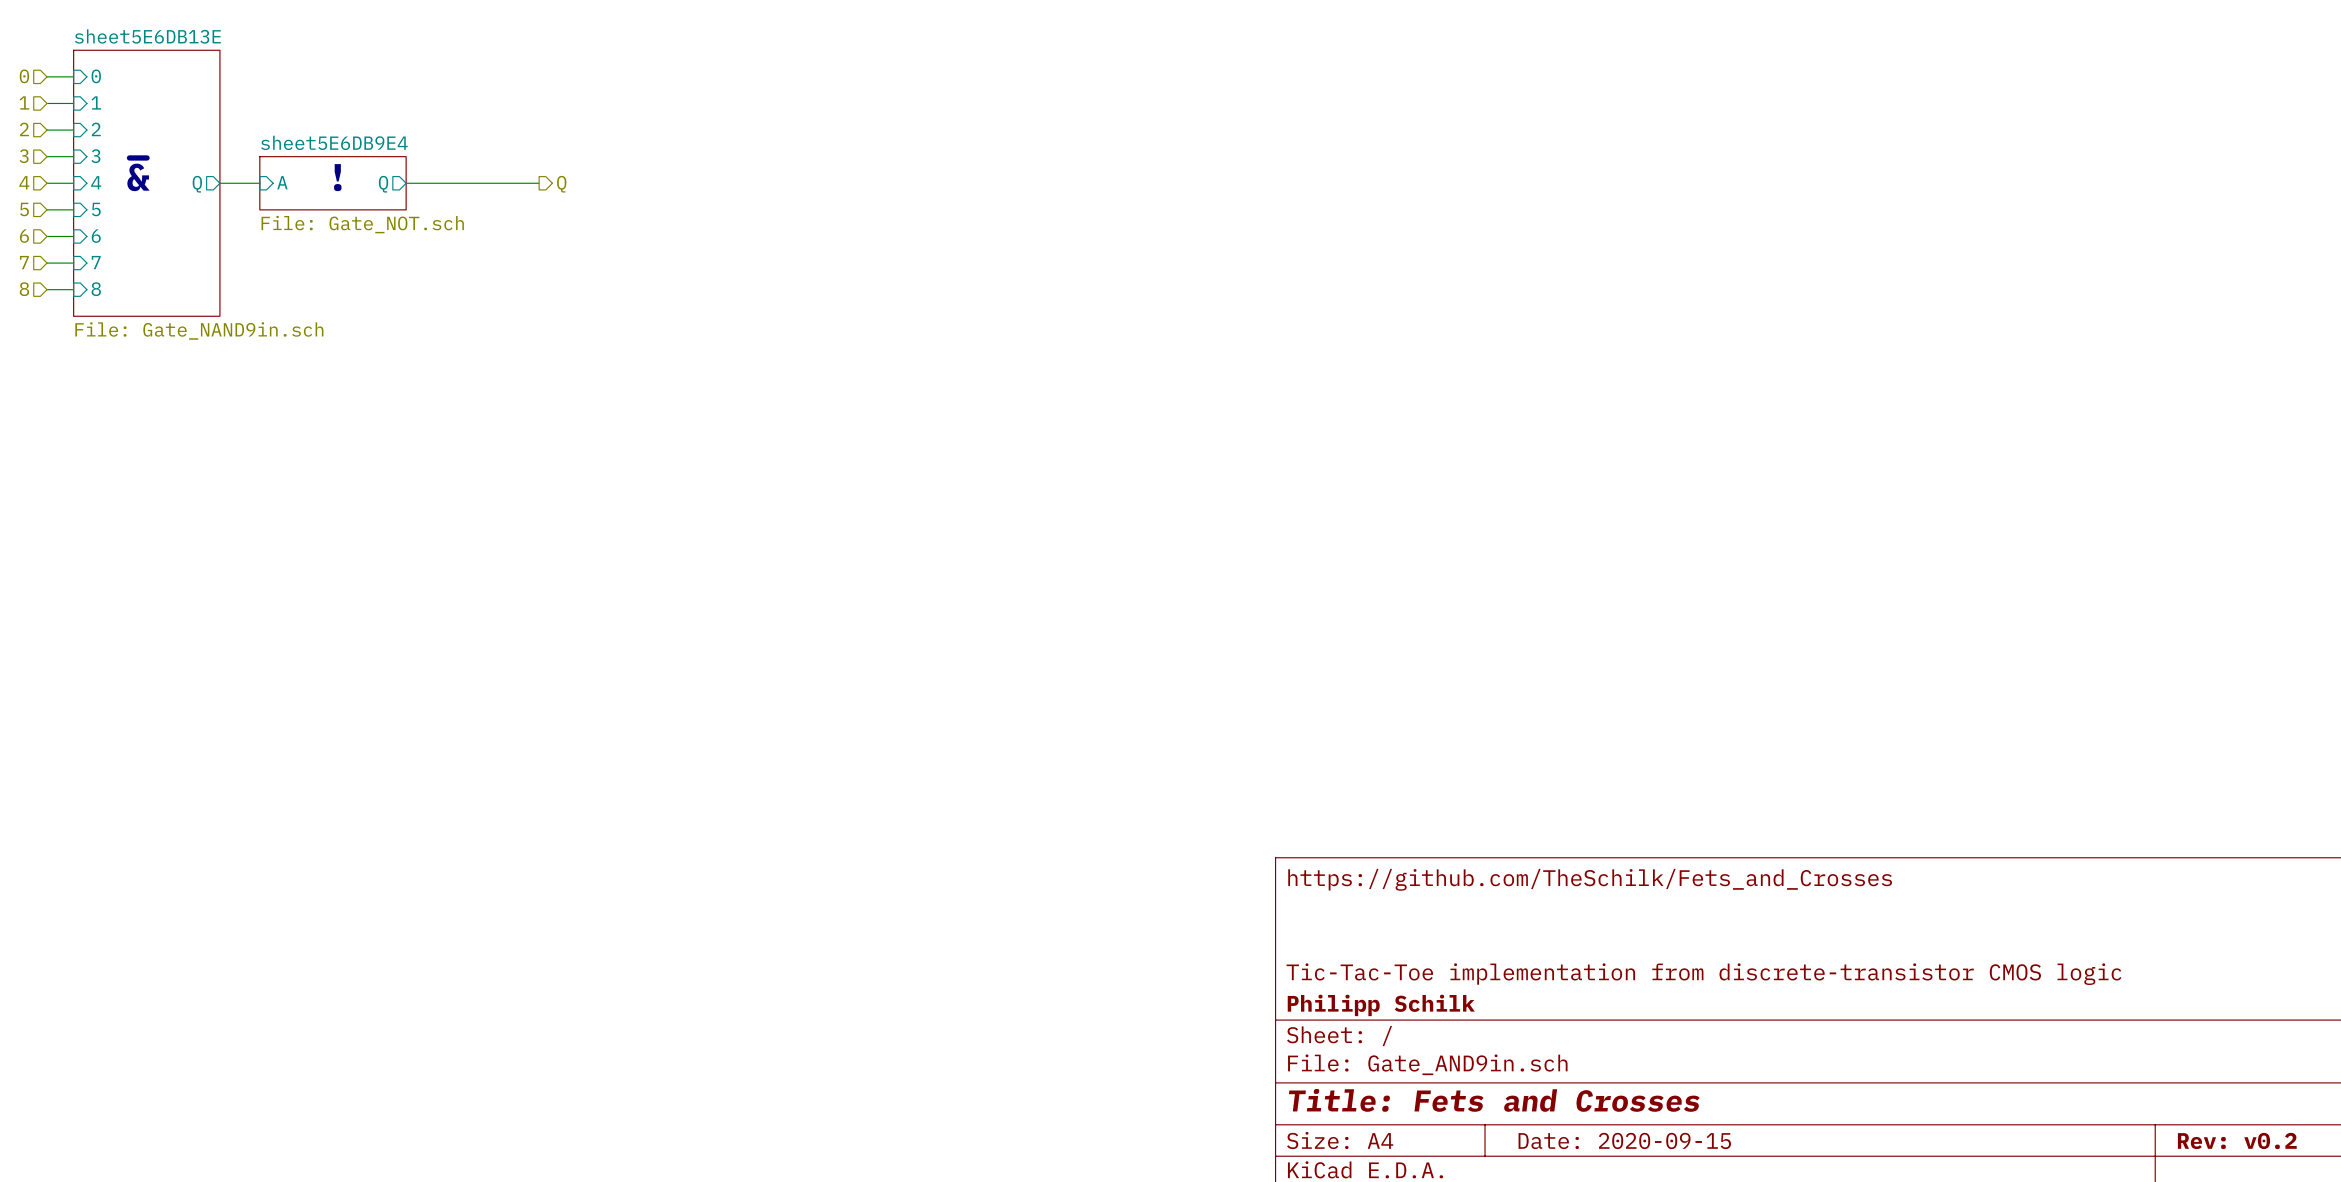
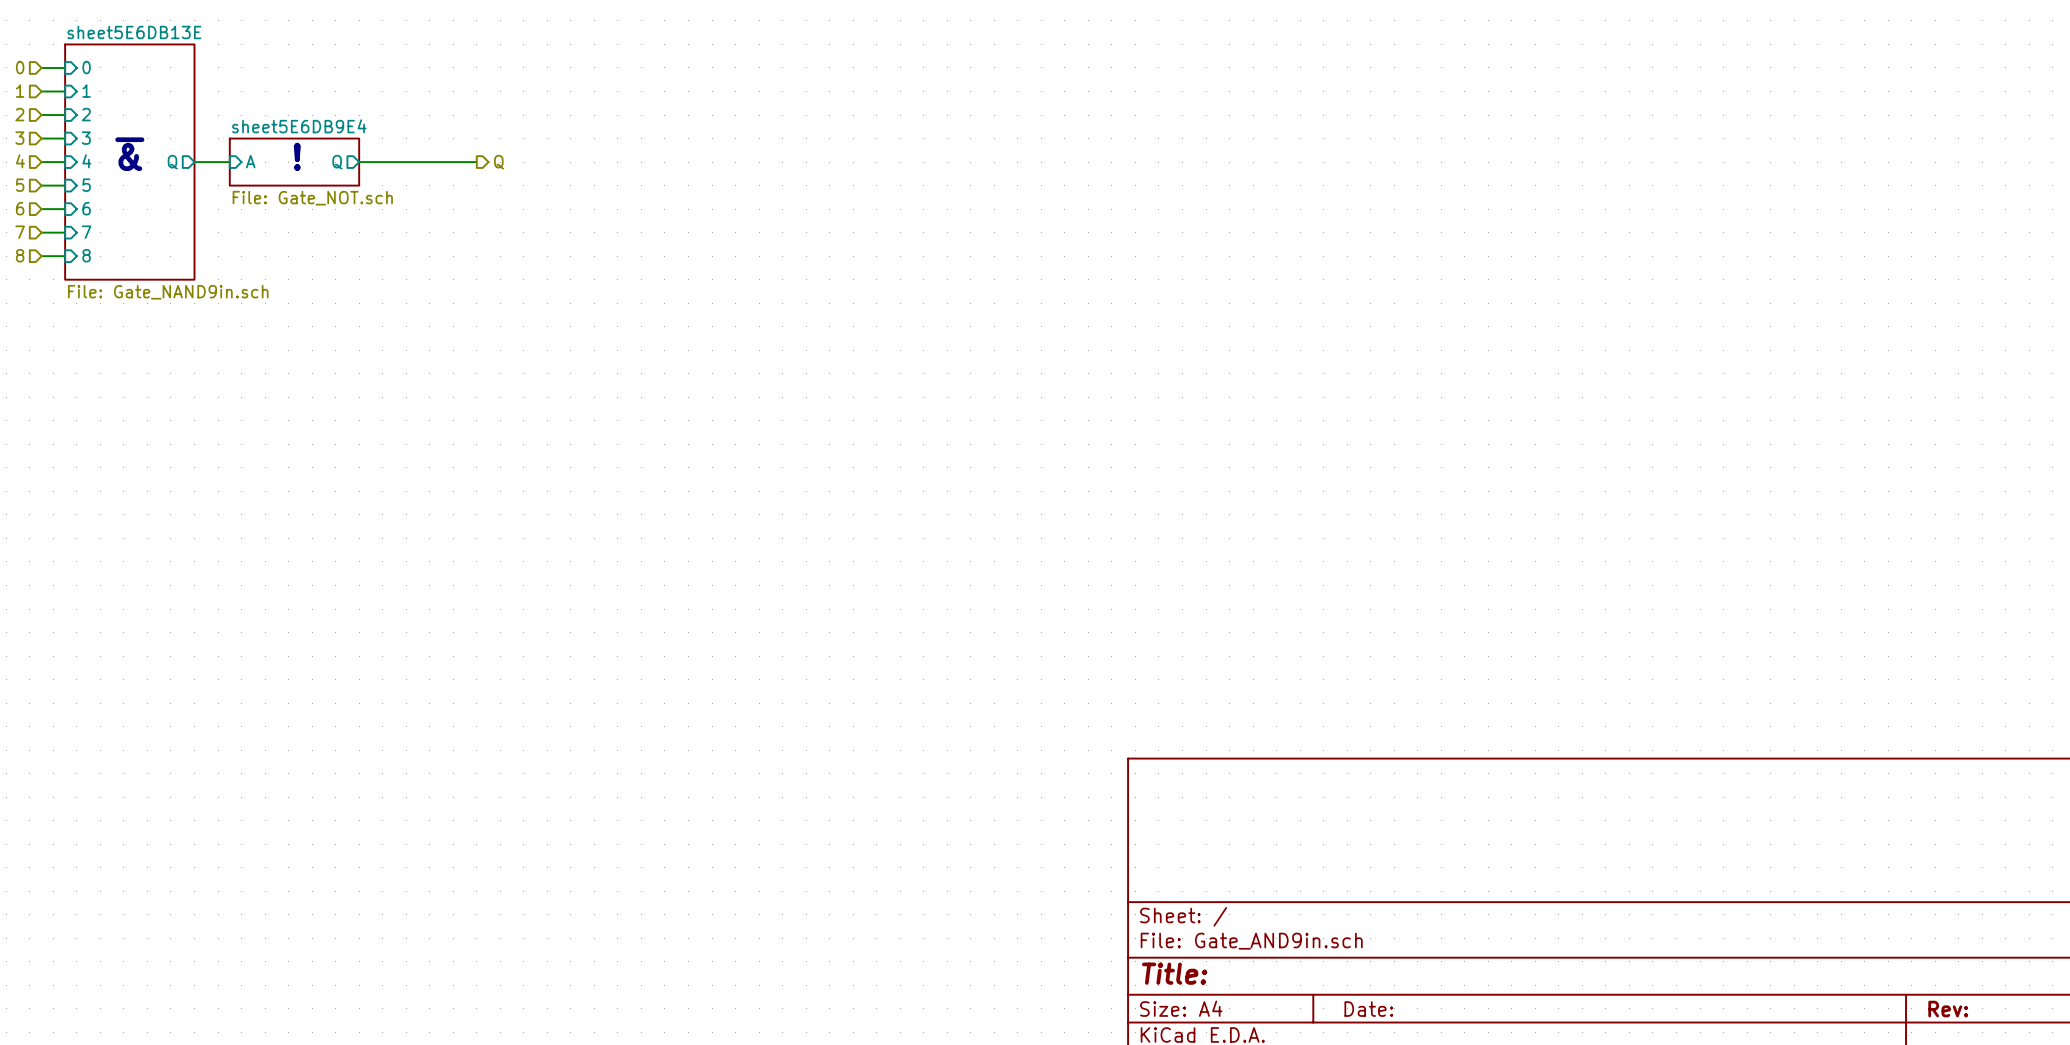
title block: https://github.com/TheSchilk/Fets_and_Crosses (1590, 879) -> none
title block: Tic-Tac-Toe implementation from discrete-transistor CMOS logic (1703, 974) -> none
title block: Philipp Schilk (1381, 1005) -> none
title block: Title: Fets and Crosses (1494, 1100) -> Title: (1174, 973)
title block: Date: 2020-09-15 (1624, 1140) -> Date: (1368, 1009)
title block: Rev: v0.2 (2237, 1140) -> Rev: (1948, 1009)

